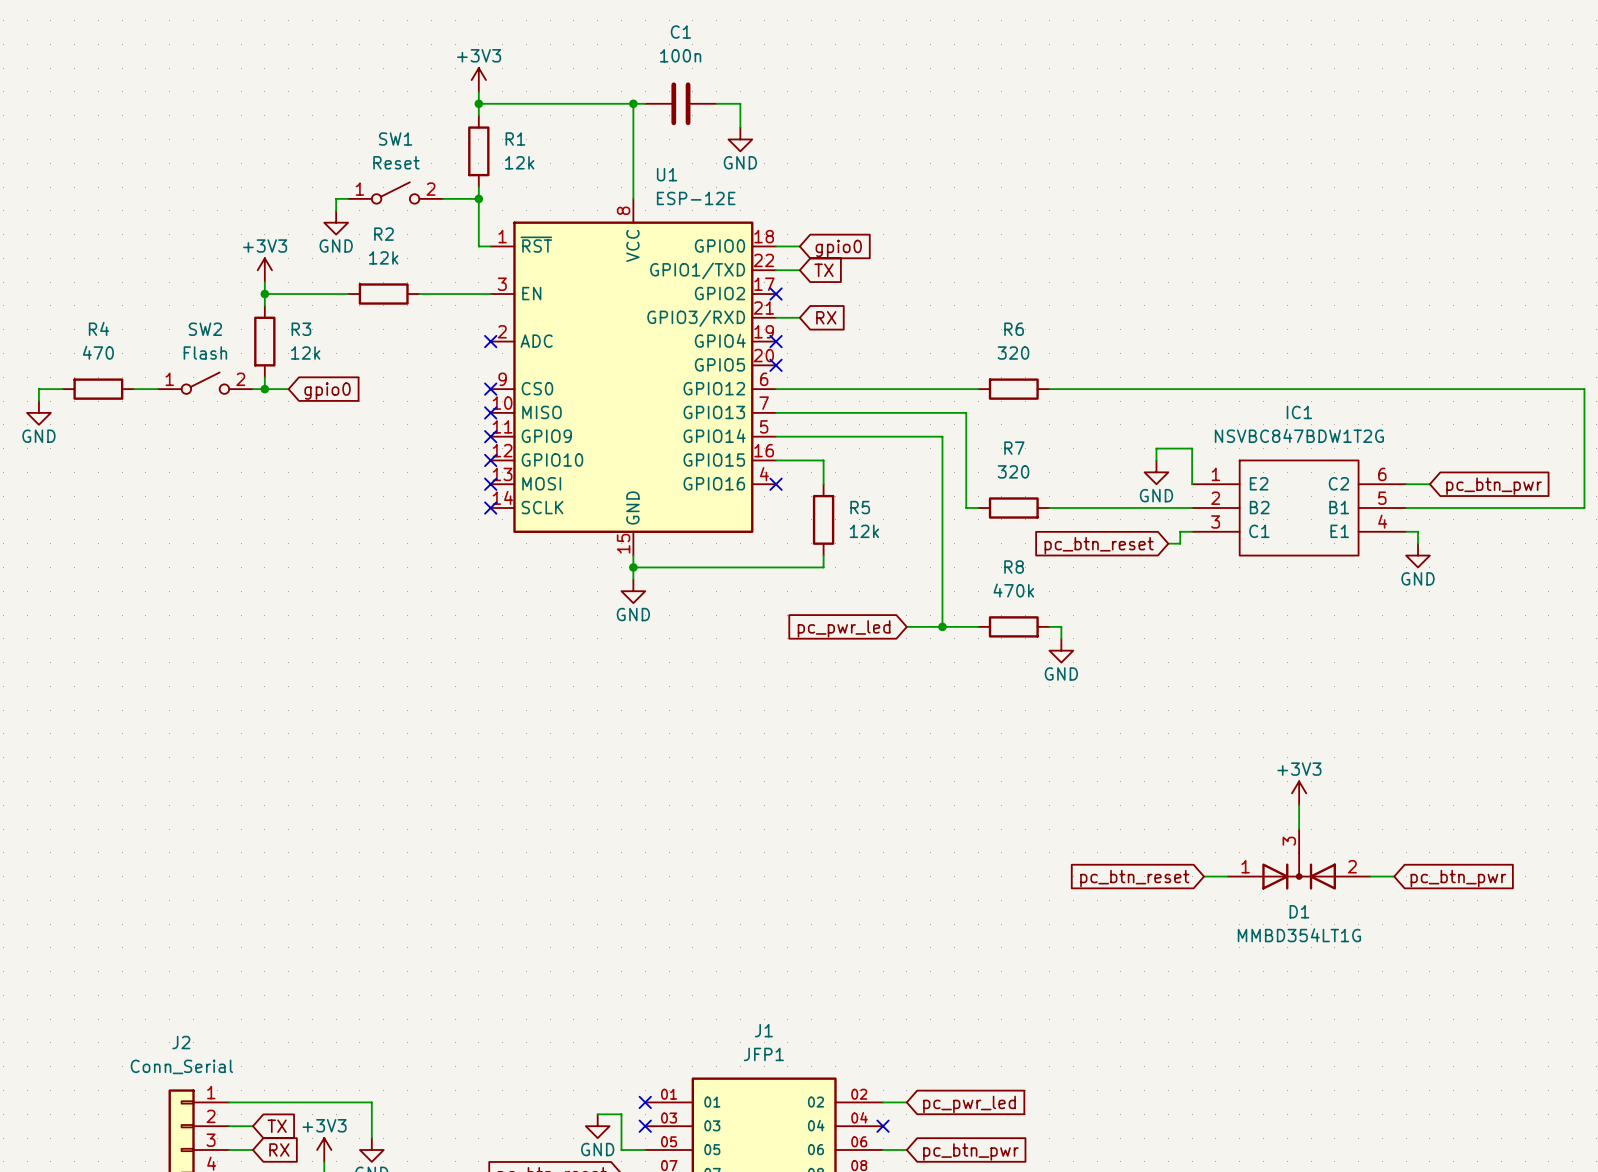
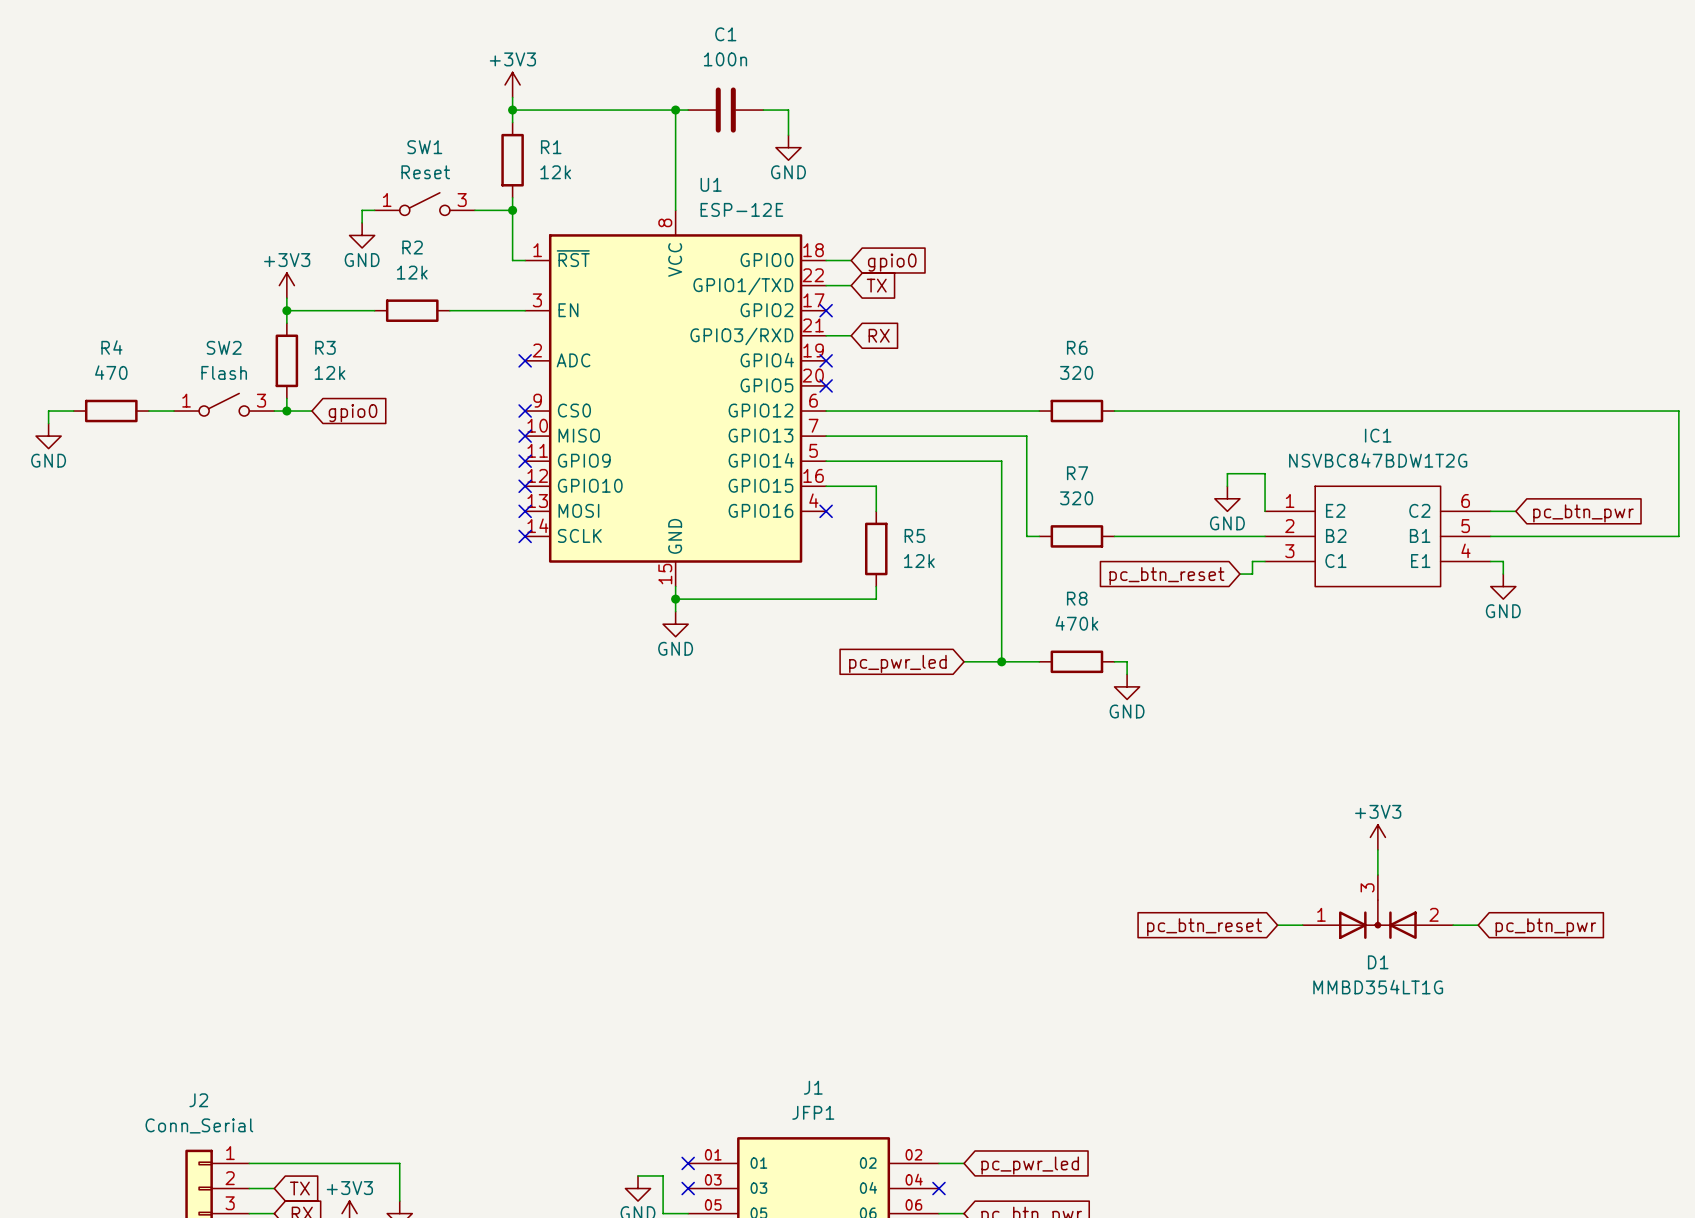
SW1 pin number: 2 (430, 189) -> 3 (462, 200)
SW2 pin number: 2 (240, 379) -> 3 (261, 400)

